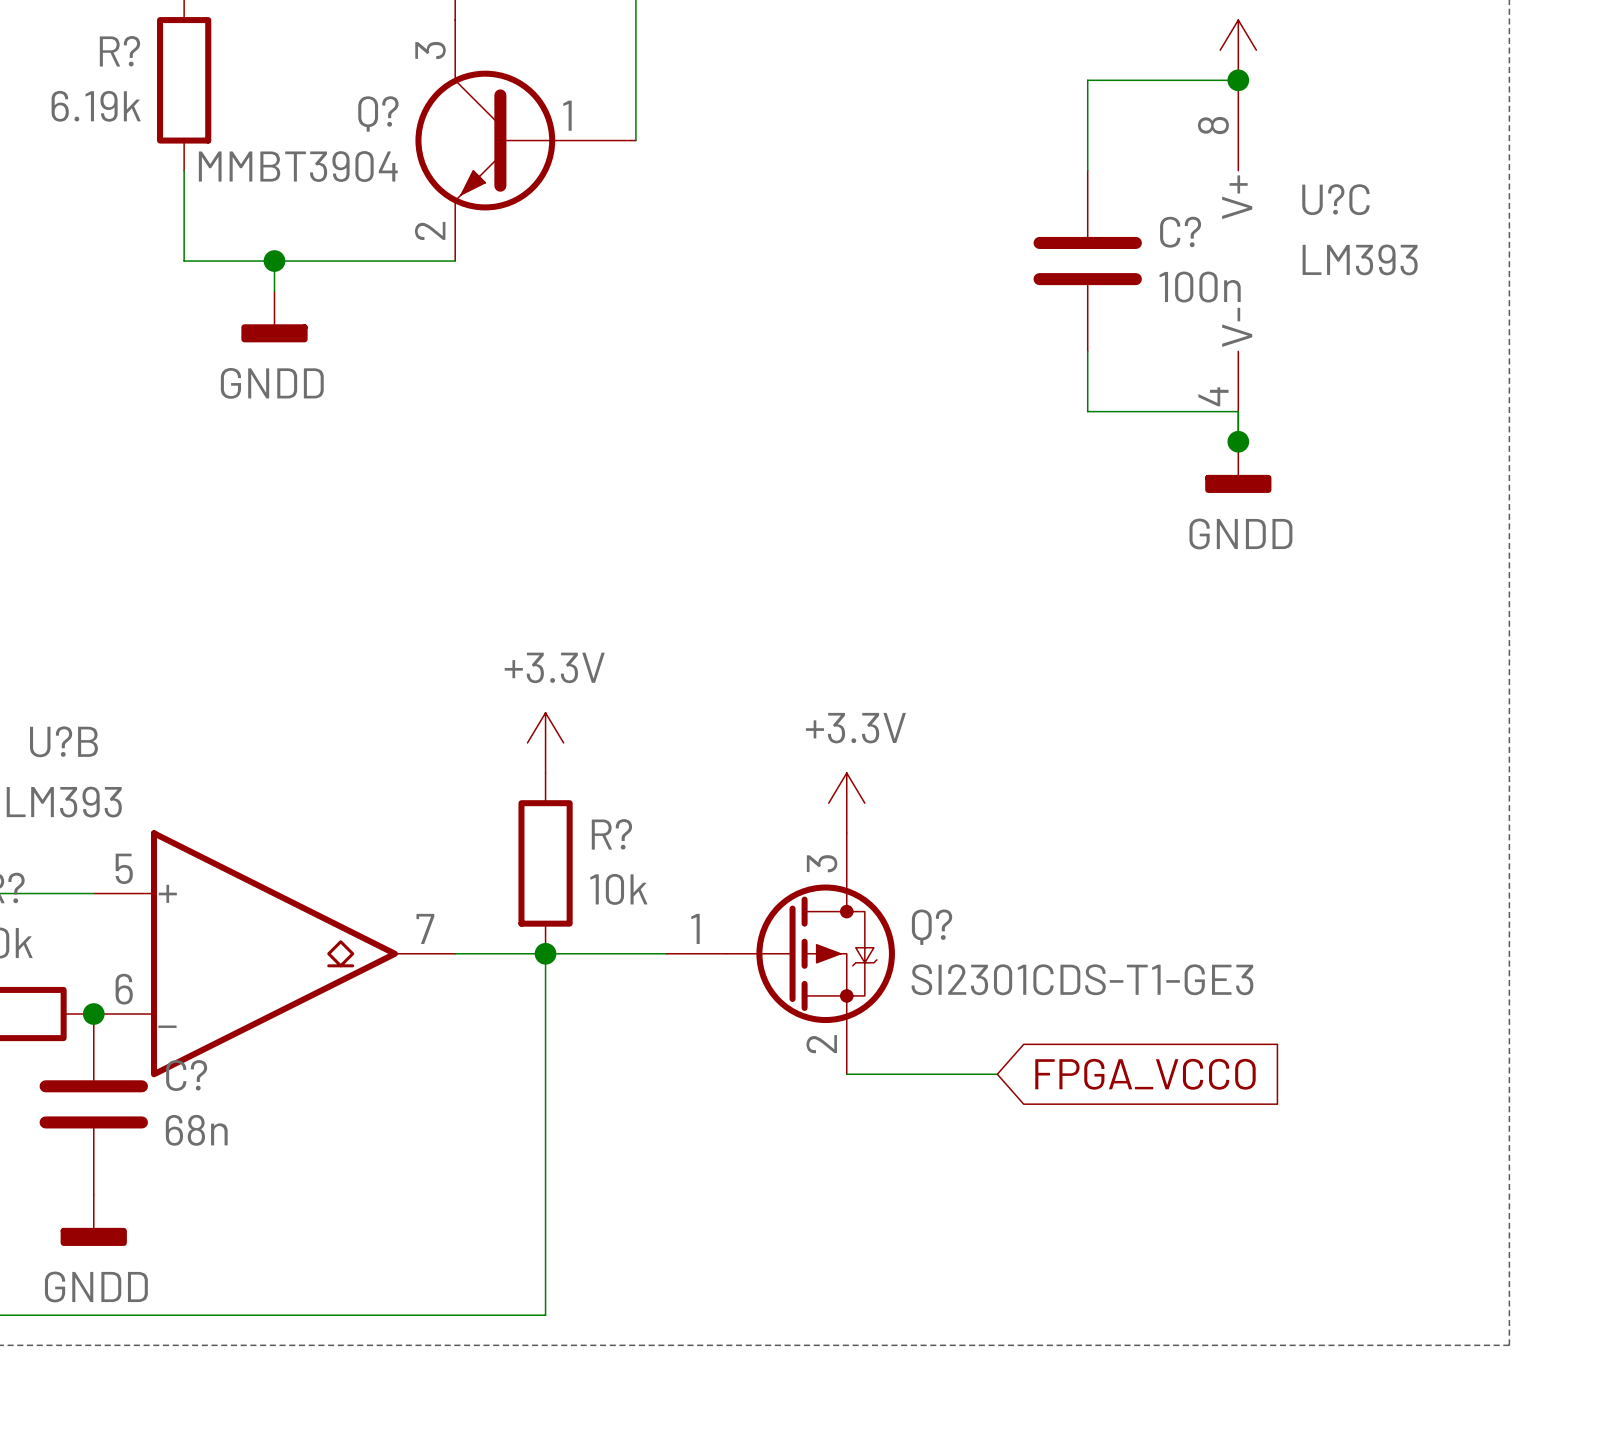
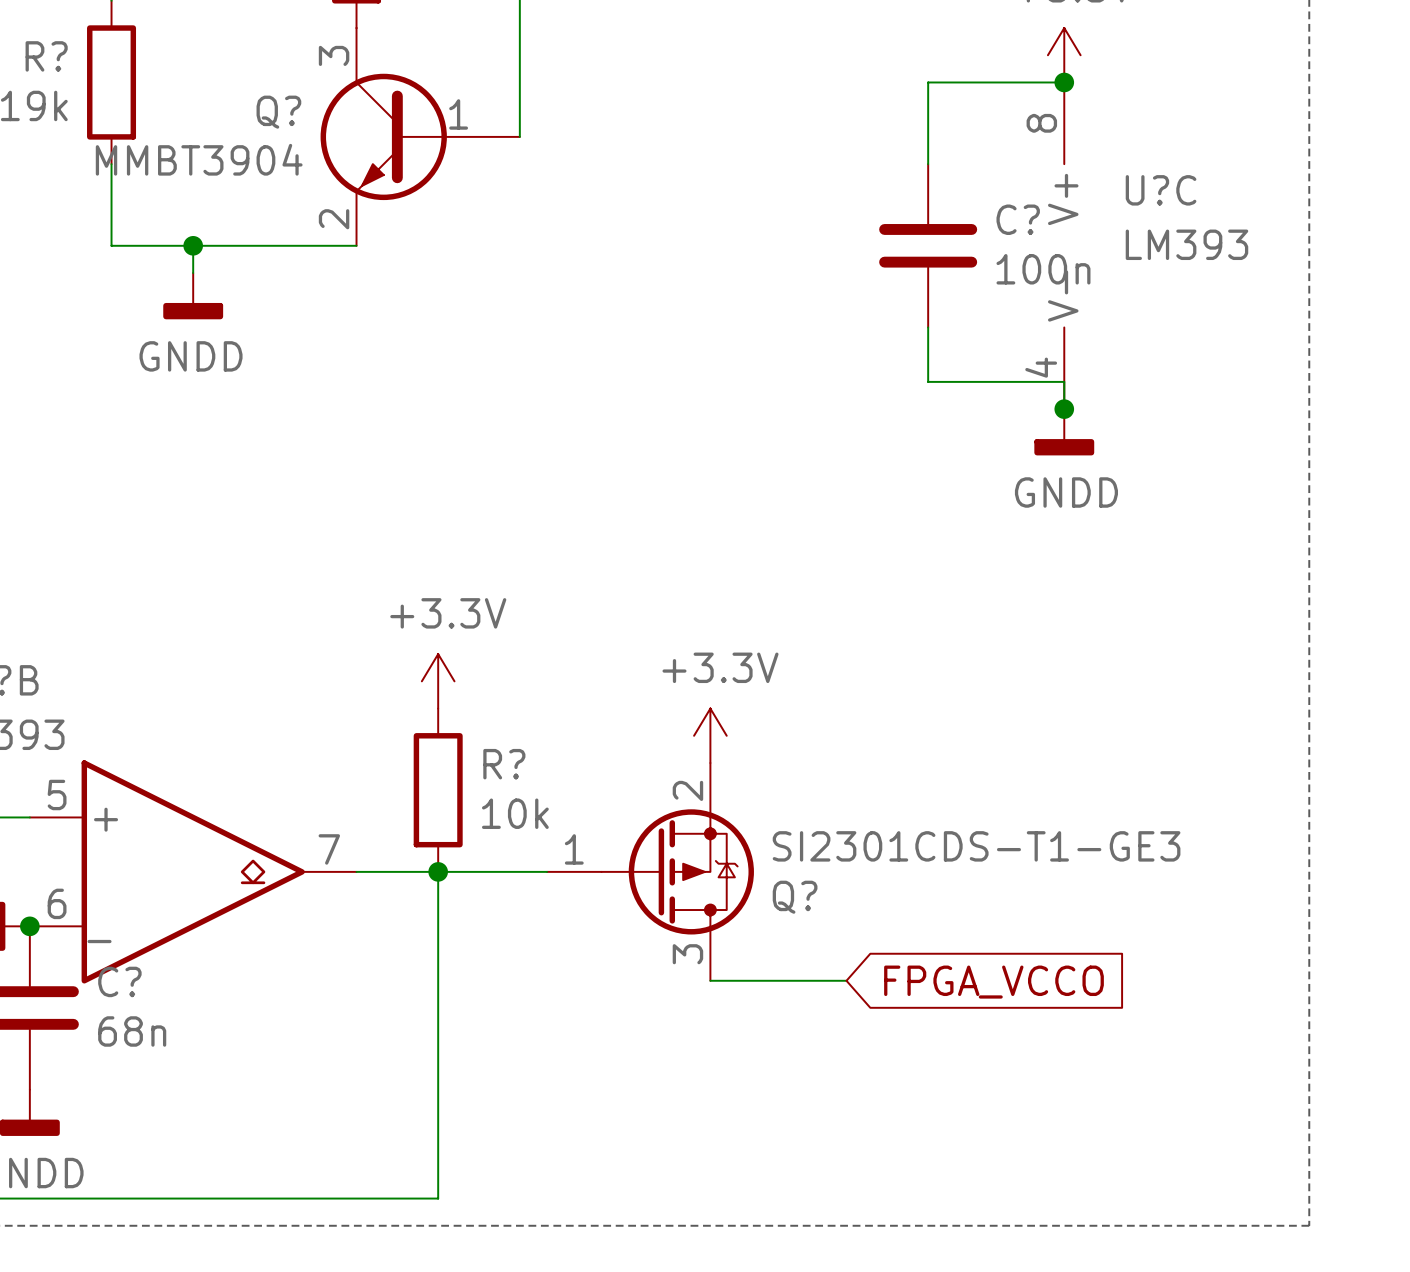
Q? flip: as is (810, 953) -> up-down (677, 871)

